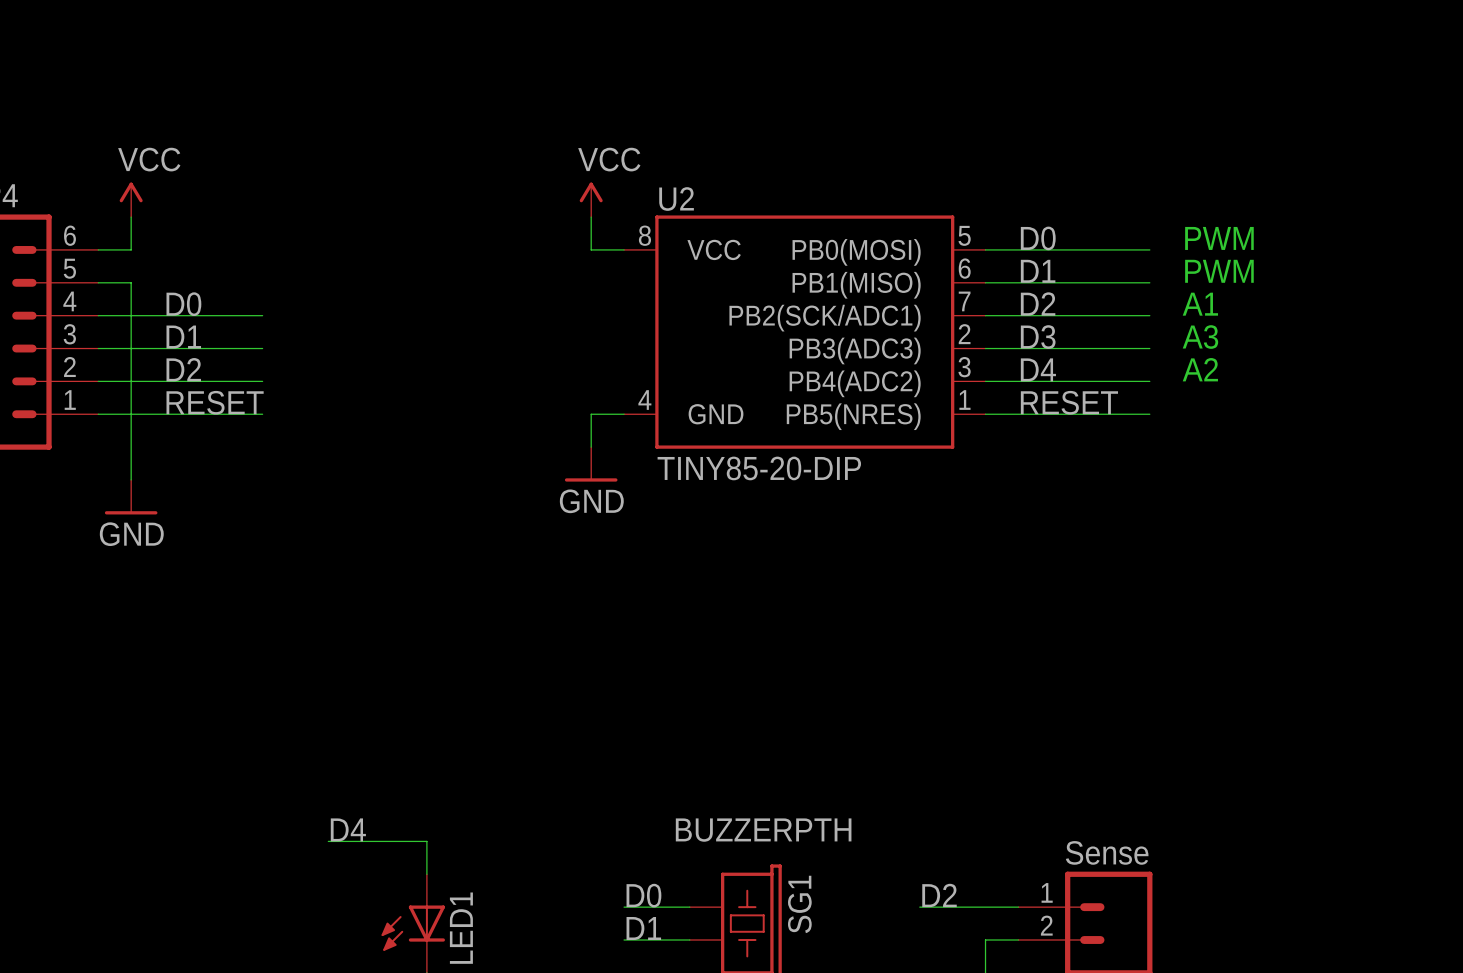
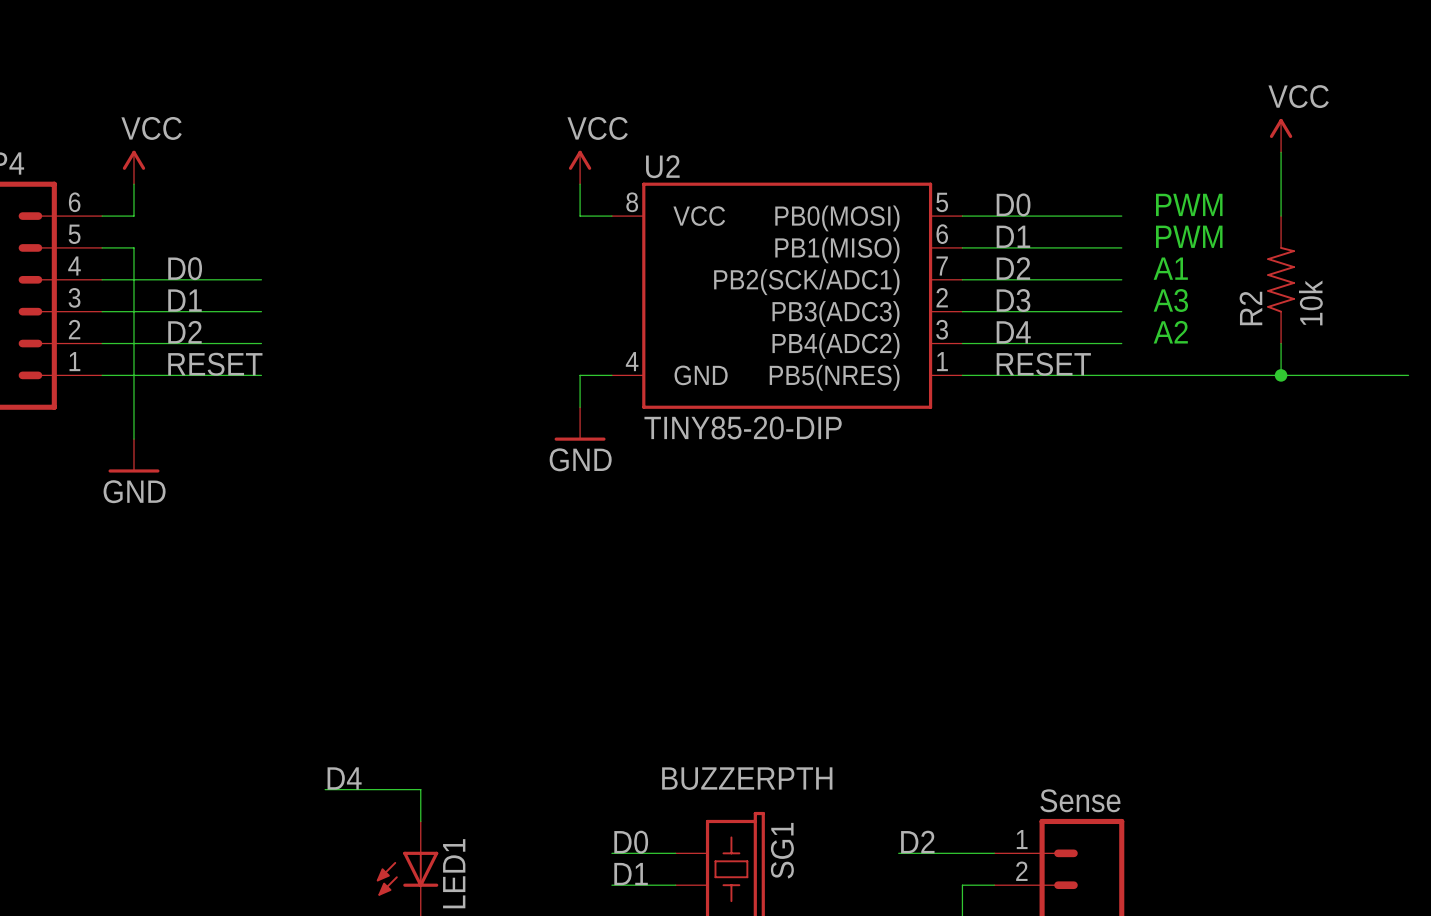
power symbol: none -> VCC (1281, 135)
wire: none -> (1281, 152) (1281, 216)
R2: none -> 10k (1281, 279)
wire: none -> (1281, 343) (1281, 375)
wire: none -> (1121, 375) (1408, 375)
junction: none -> (1281, 375)

